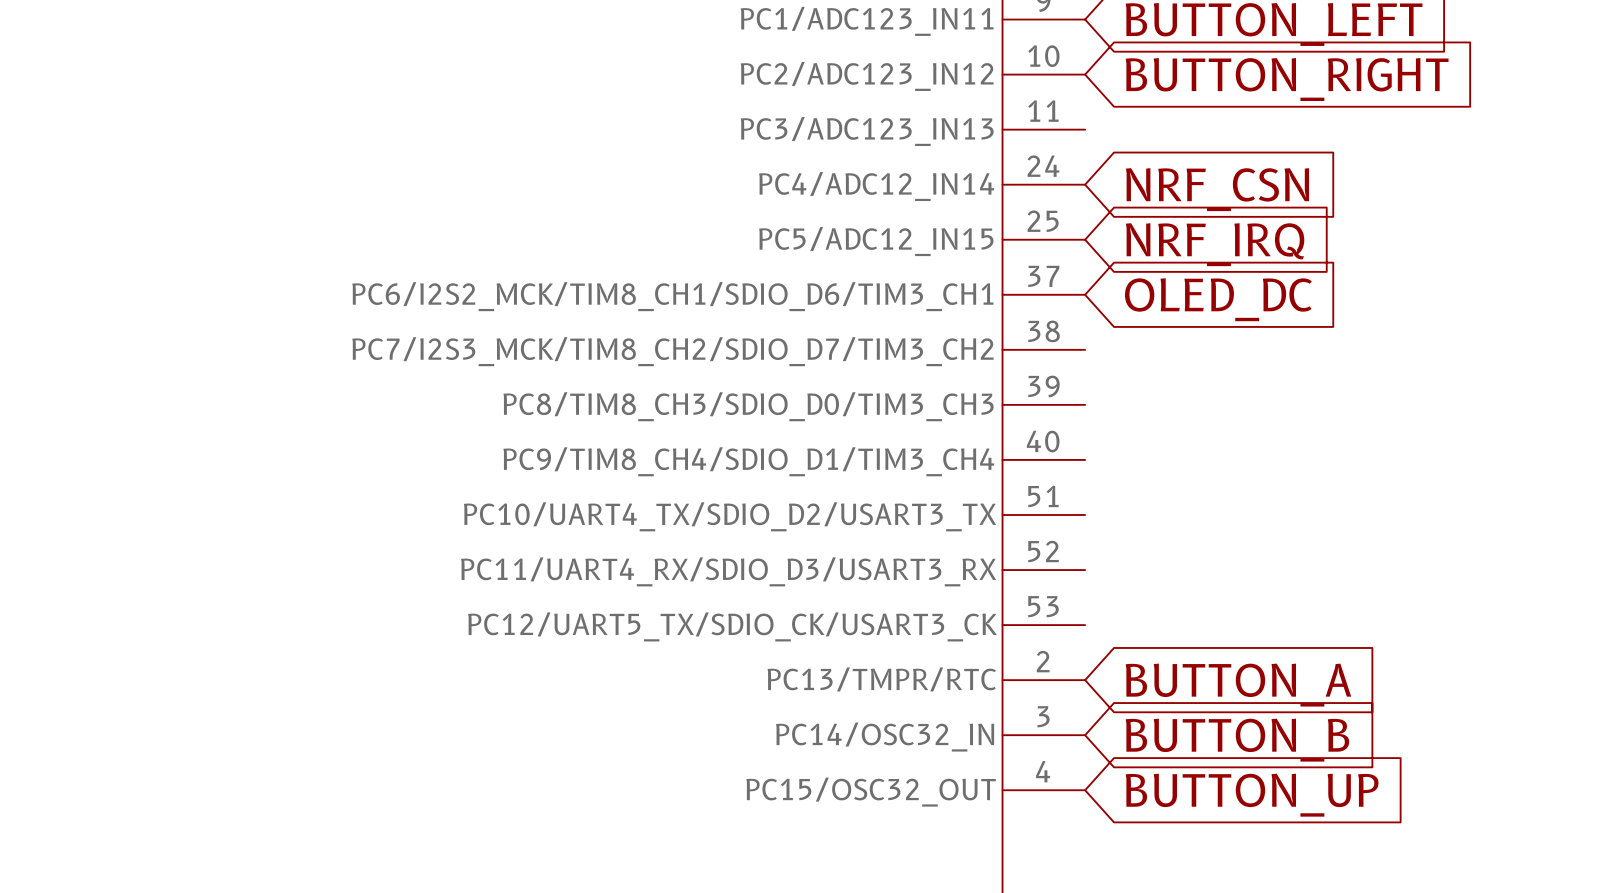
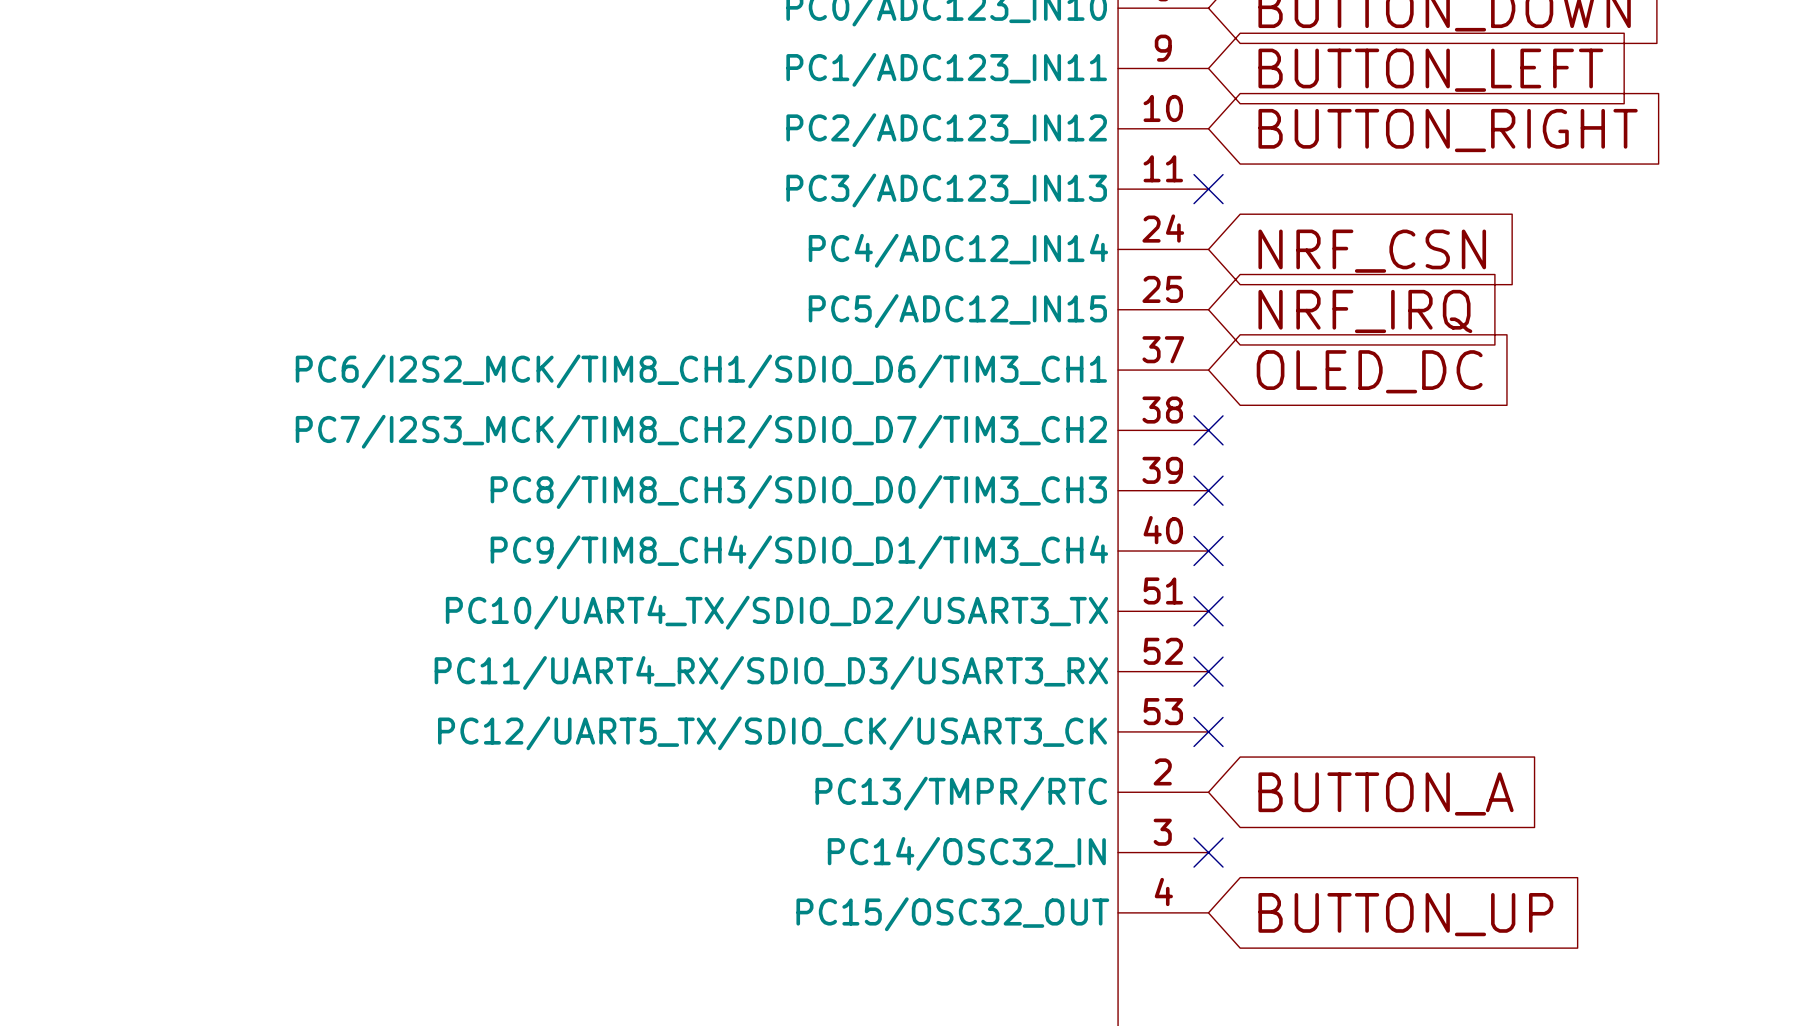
no-connect mark: none -> (1208, 189)
no-connect mark: none -> (1208, 430)
no-connect mark: none -> (1208, 490)
no-connect mark: none -> (1208, 551)
no-connect mark: none -> (1208, 611)
no-connect mark: none -> (1208, 671)
no-connect mark: none -> (1208, 731)
no-connect mark: none -> (1208, 852)
global label: BUTTON_B (1237, 740) -> none

